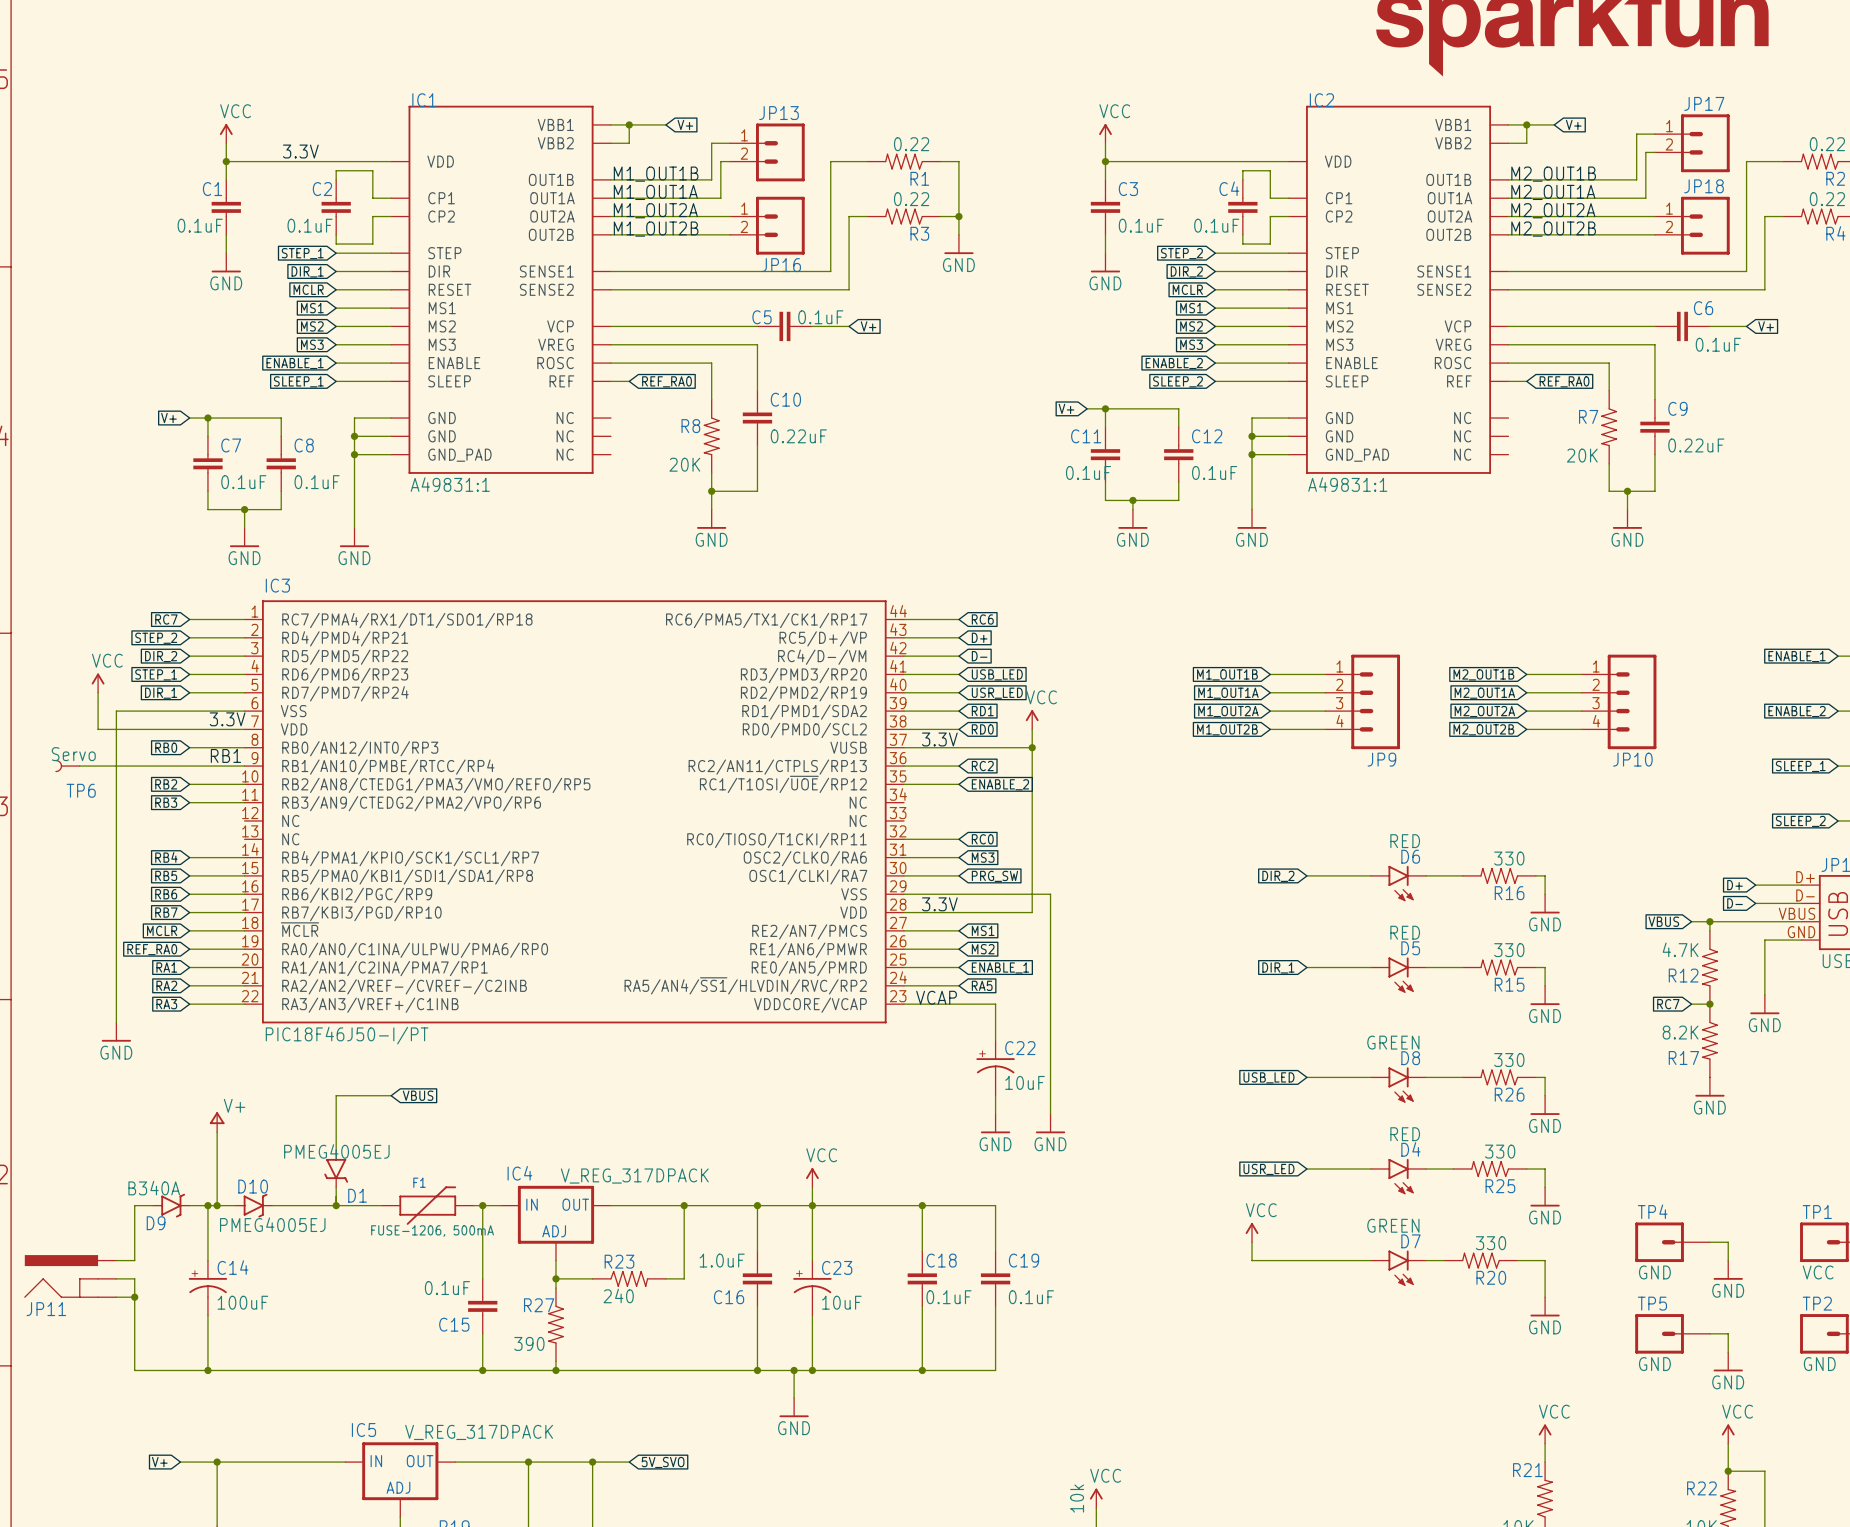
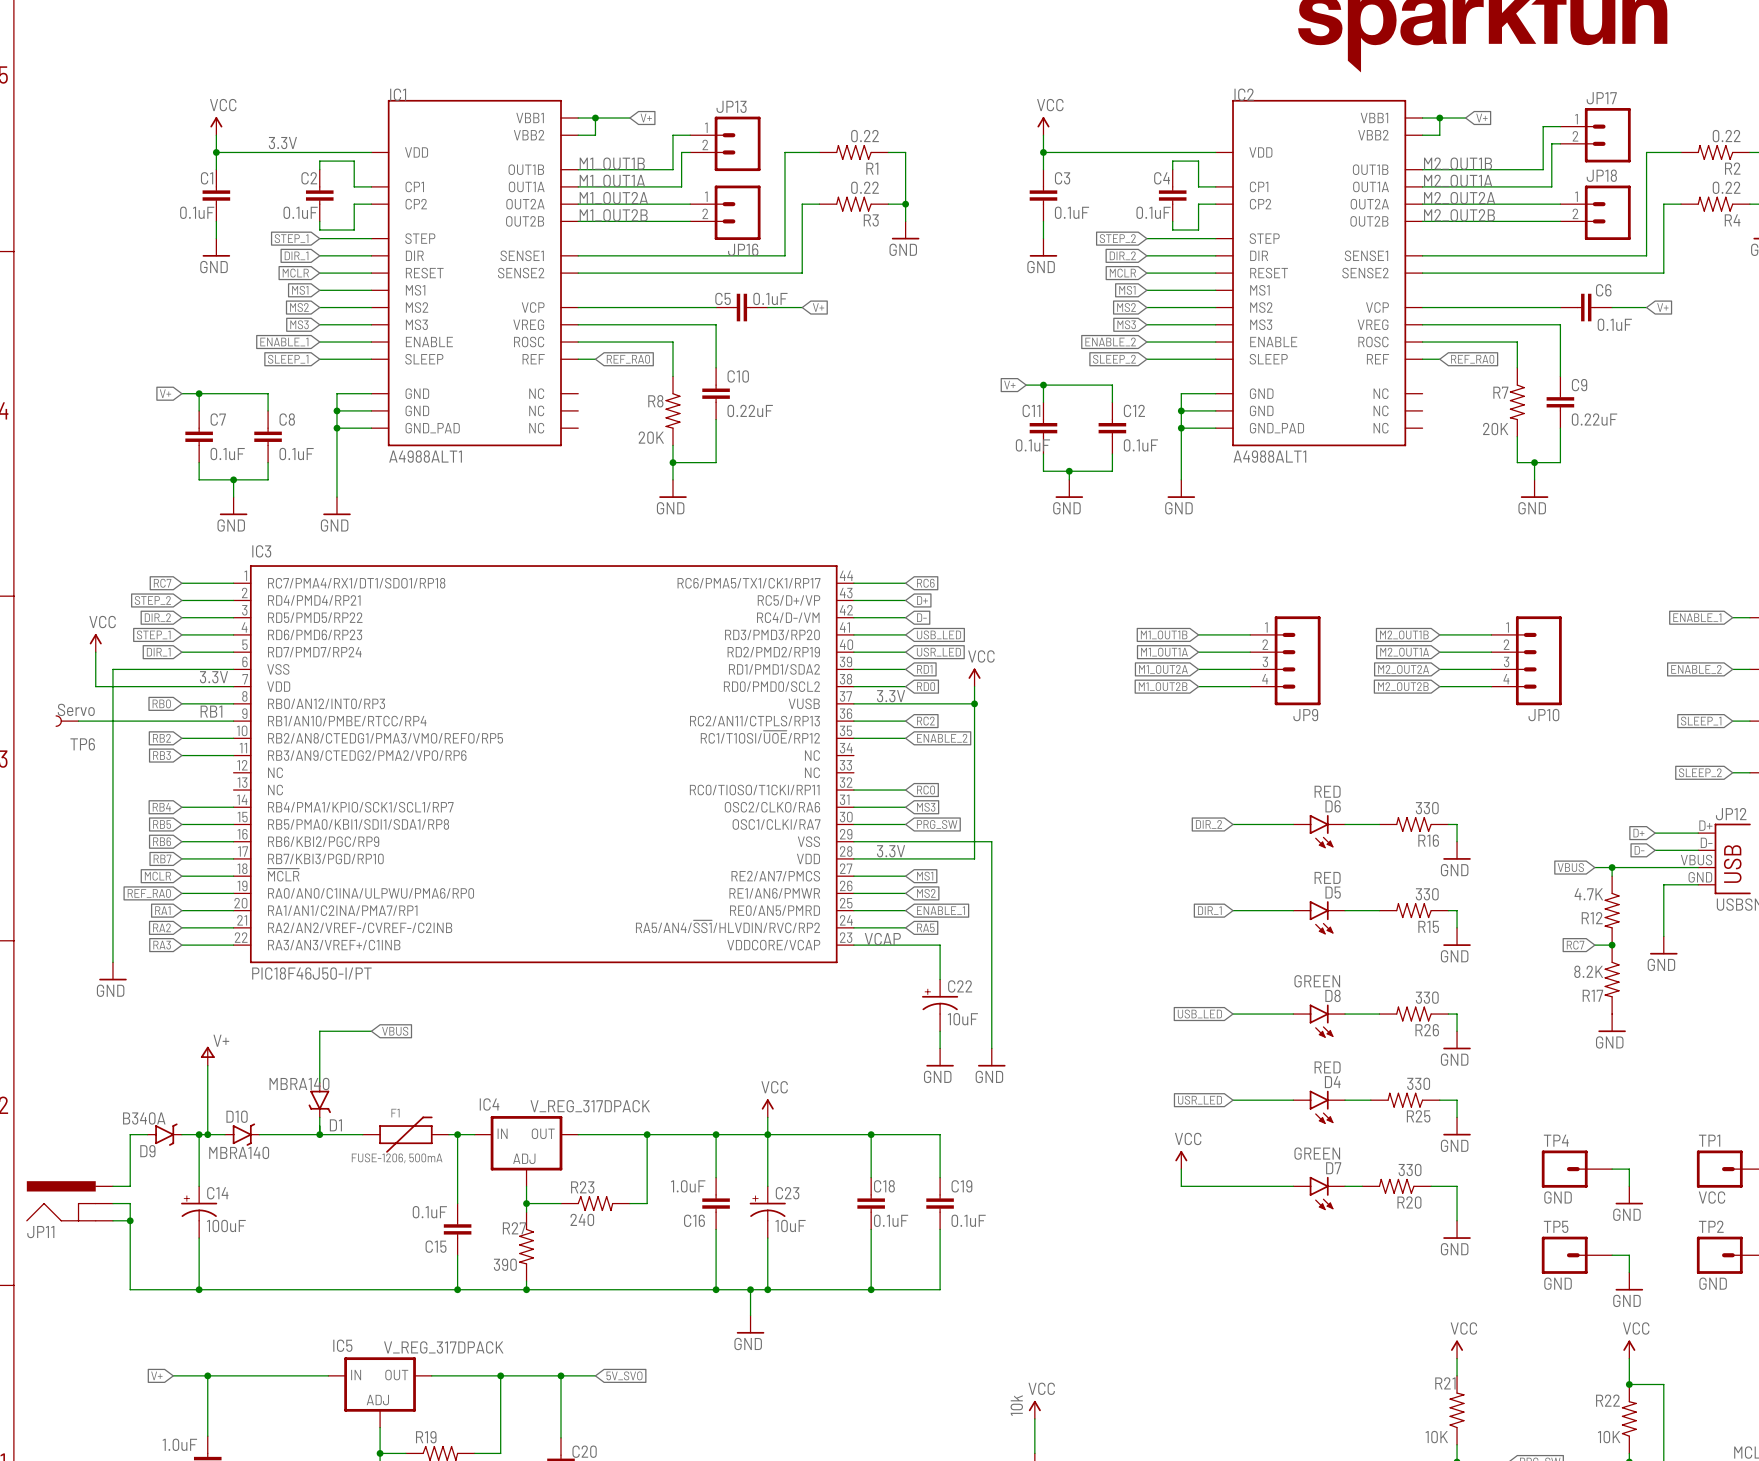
IC1 value: A49831:1 (450, 484) -> A4988ALT1 (425, 456)
IC2 value: A49831:1 (1347, 484) -> A4988ALT1 (1269, 456)
D1 value: PMEG4005EJ (336, 1151) -> MBRA140 (299, 1083)
D10 value: PMEG4005EJ (272, 1224) -> MBRA140 (239, 1152)

